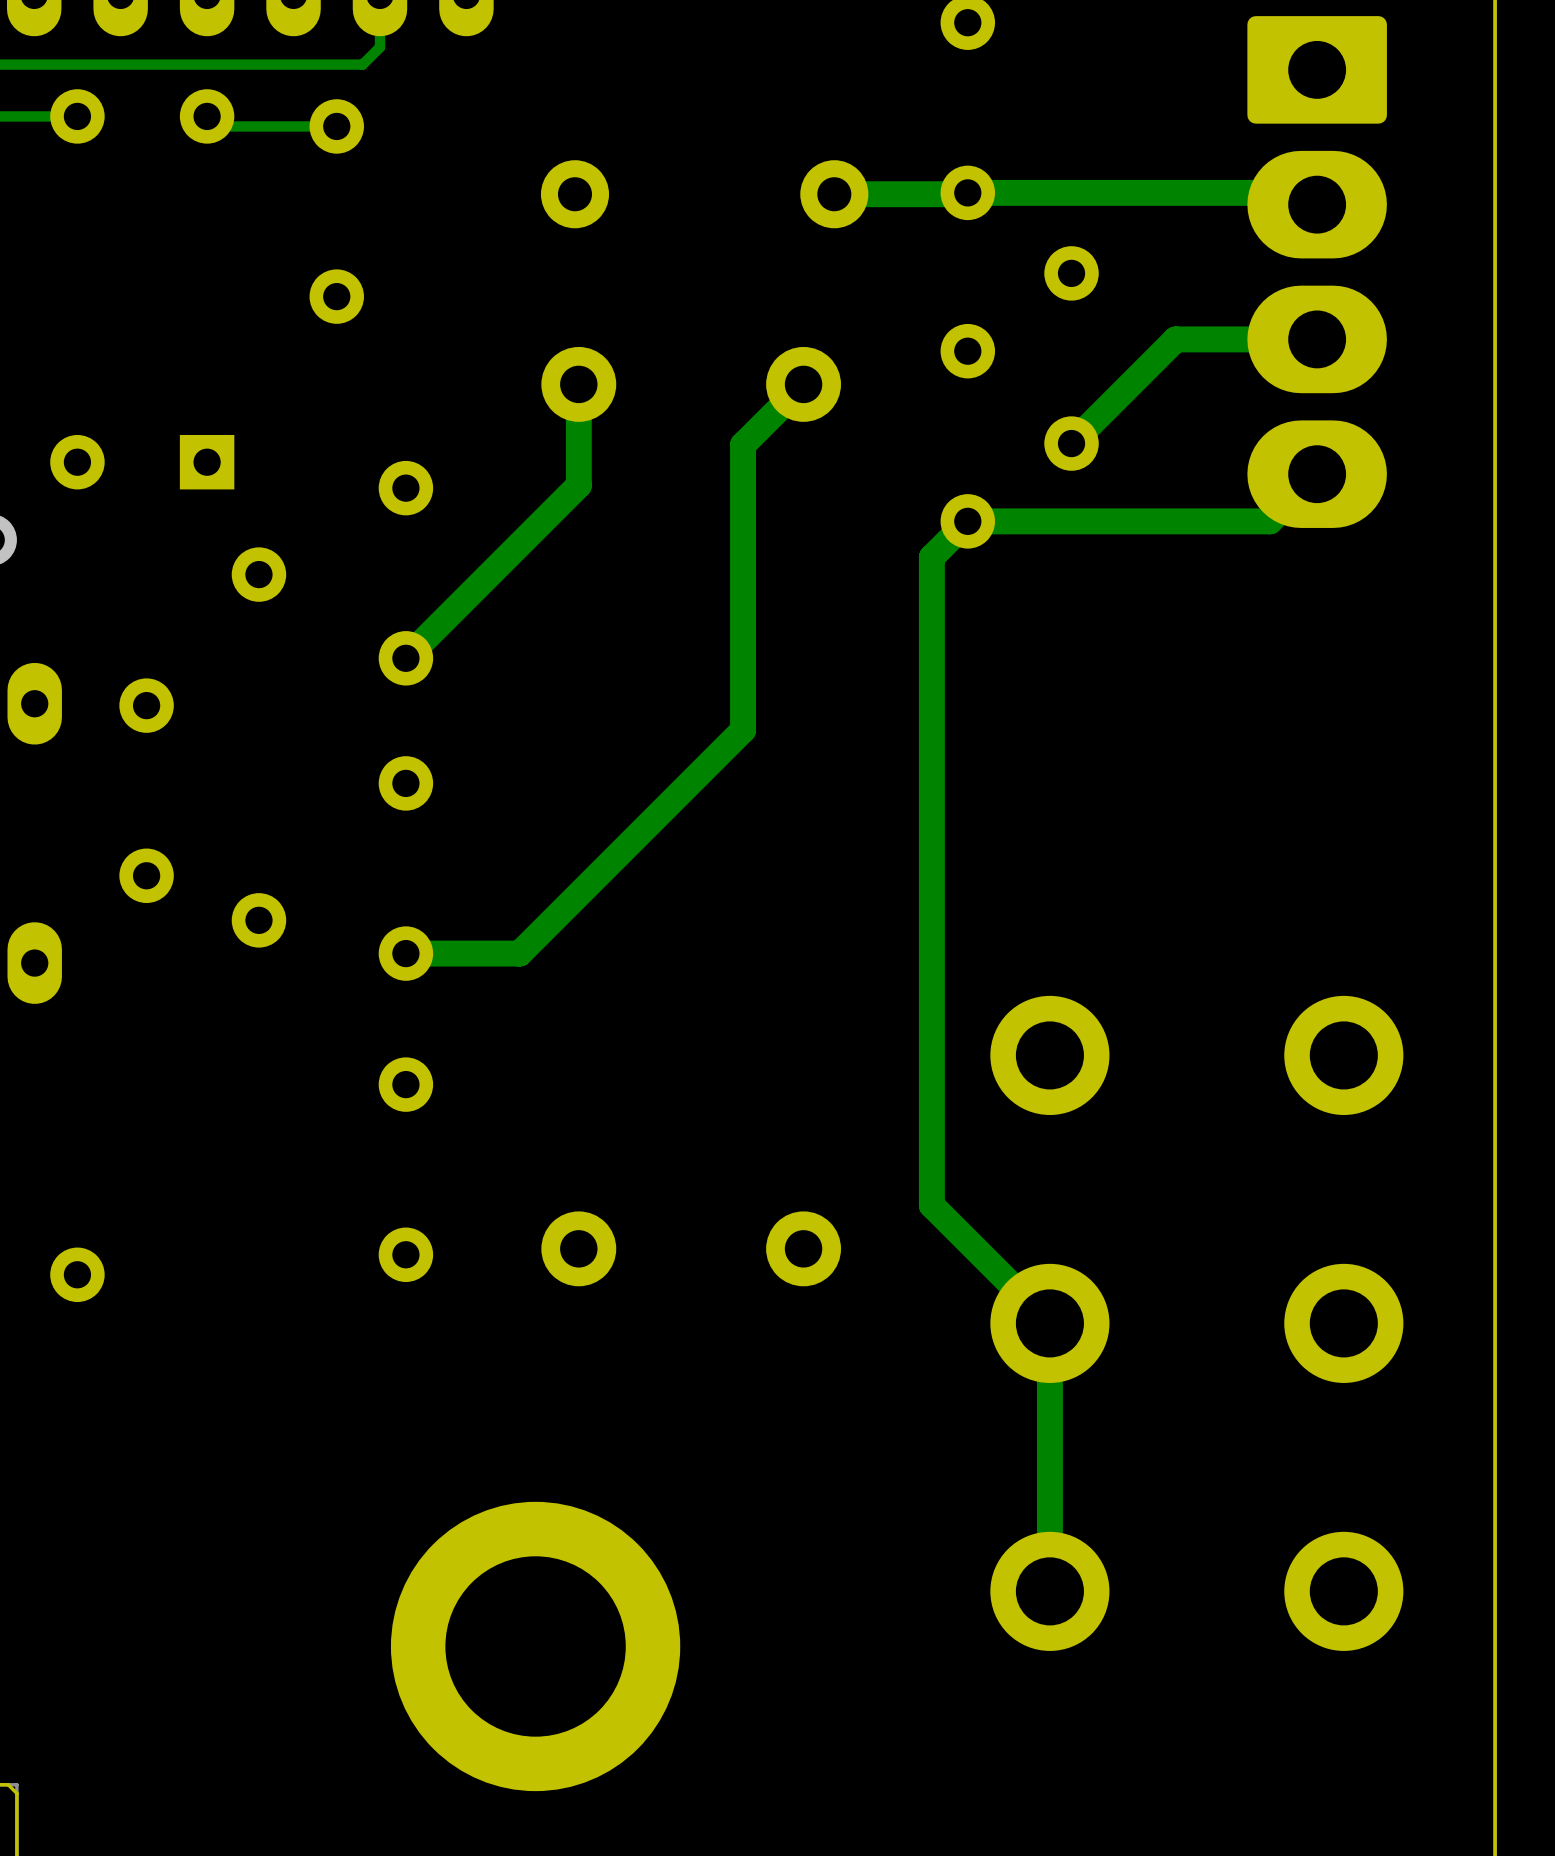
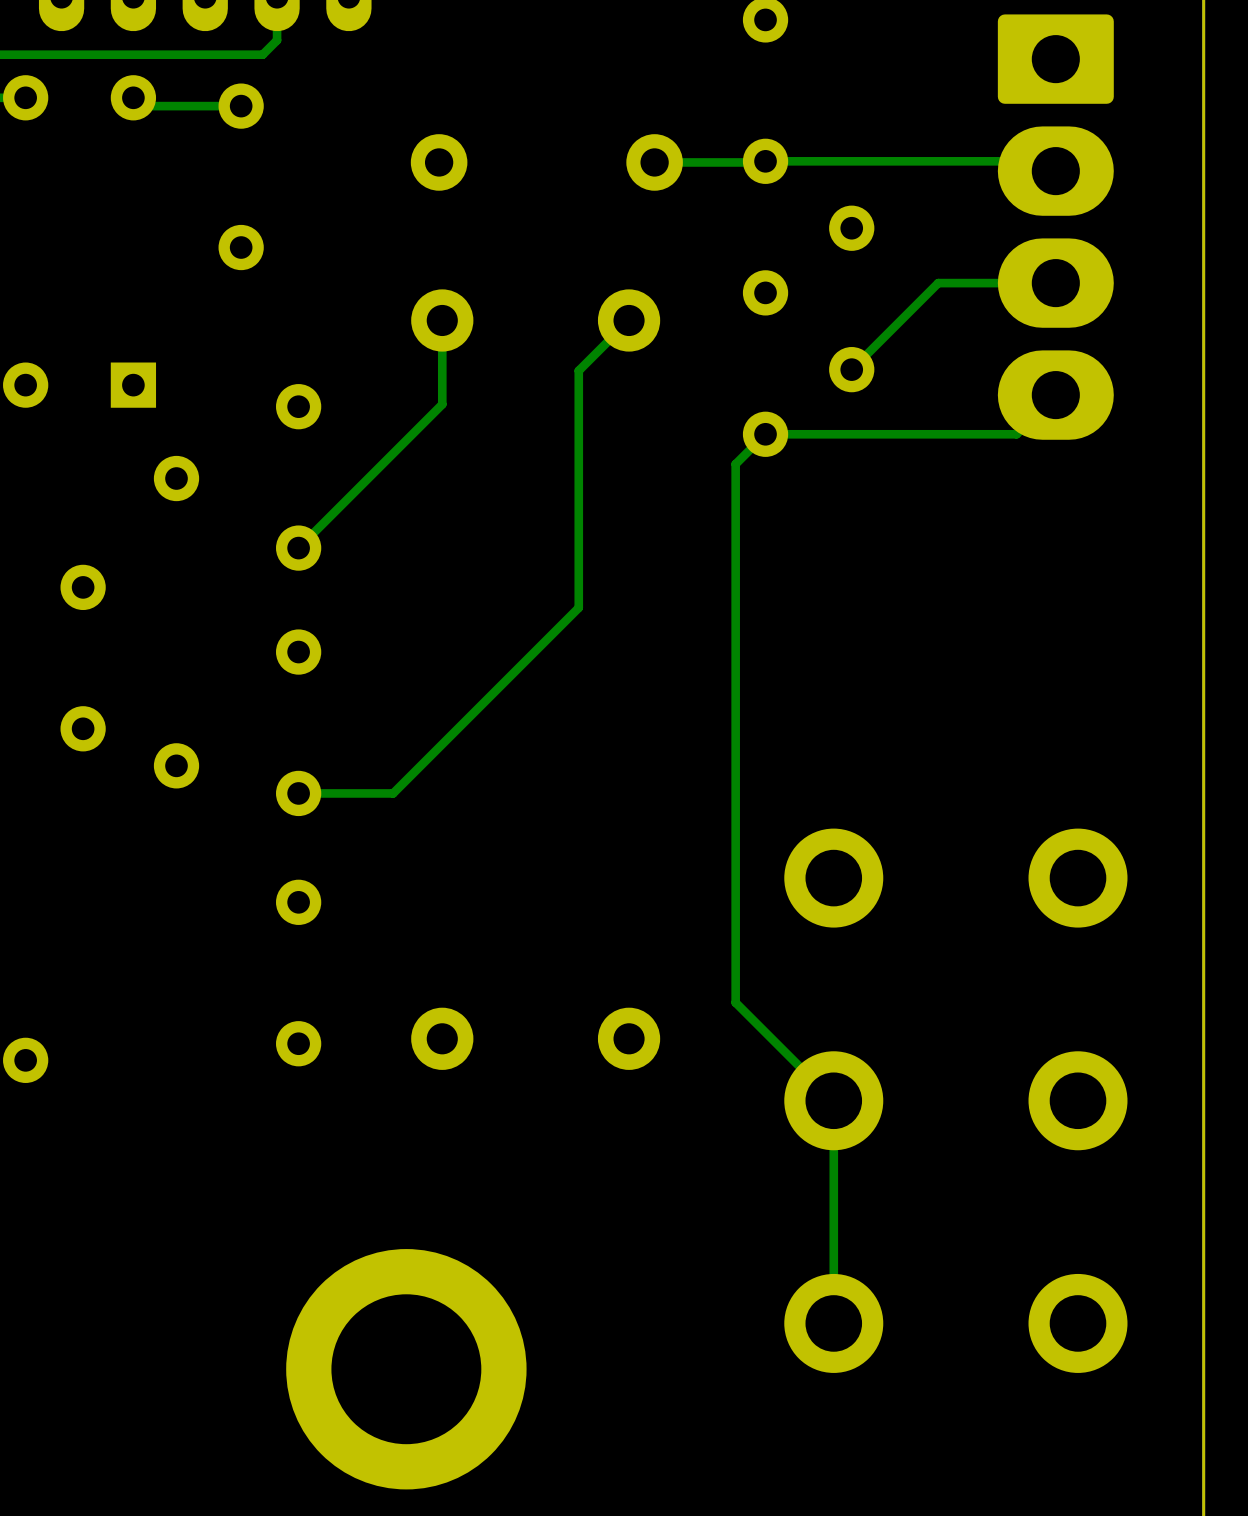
track width: thick (834, 194) (1305, 192) (1317, 204) -> thin (654, 162) (1046, 161) (1055, 171)
track width: thick (1317, 339) (1175, 339) (1071, 443) -> thin (1055, 283) (938, 283) (851, 369)
track width: thick (578, 384) (578, 485) (405, 658) -> thin (442, 320) (442, 404) (298, 548)
track width: thick (803, 384) (743, 444) (743, 730) (519, 953) (405, 953) -> thin (629, 320) (578, 370) (578, 607) (393, 793) (298, 793)
track width: thick (1317, 474) (1269, 521) (967, 521) (931, 557) (931, 1205) (1049, 1323) (1049, 1591) -> thin (1055, 395) (1016, 434) (765, 434) (735, 464) (735, 1002) (833, 1100) (833, 1323)

